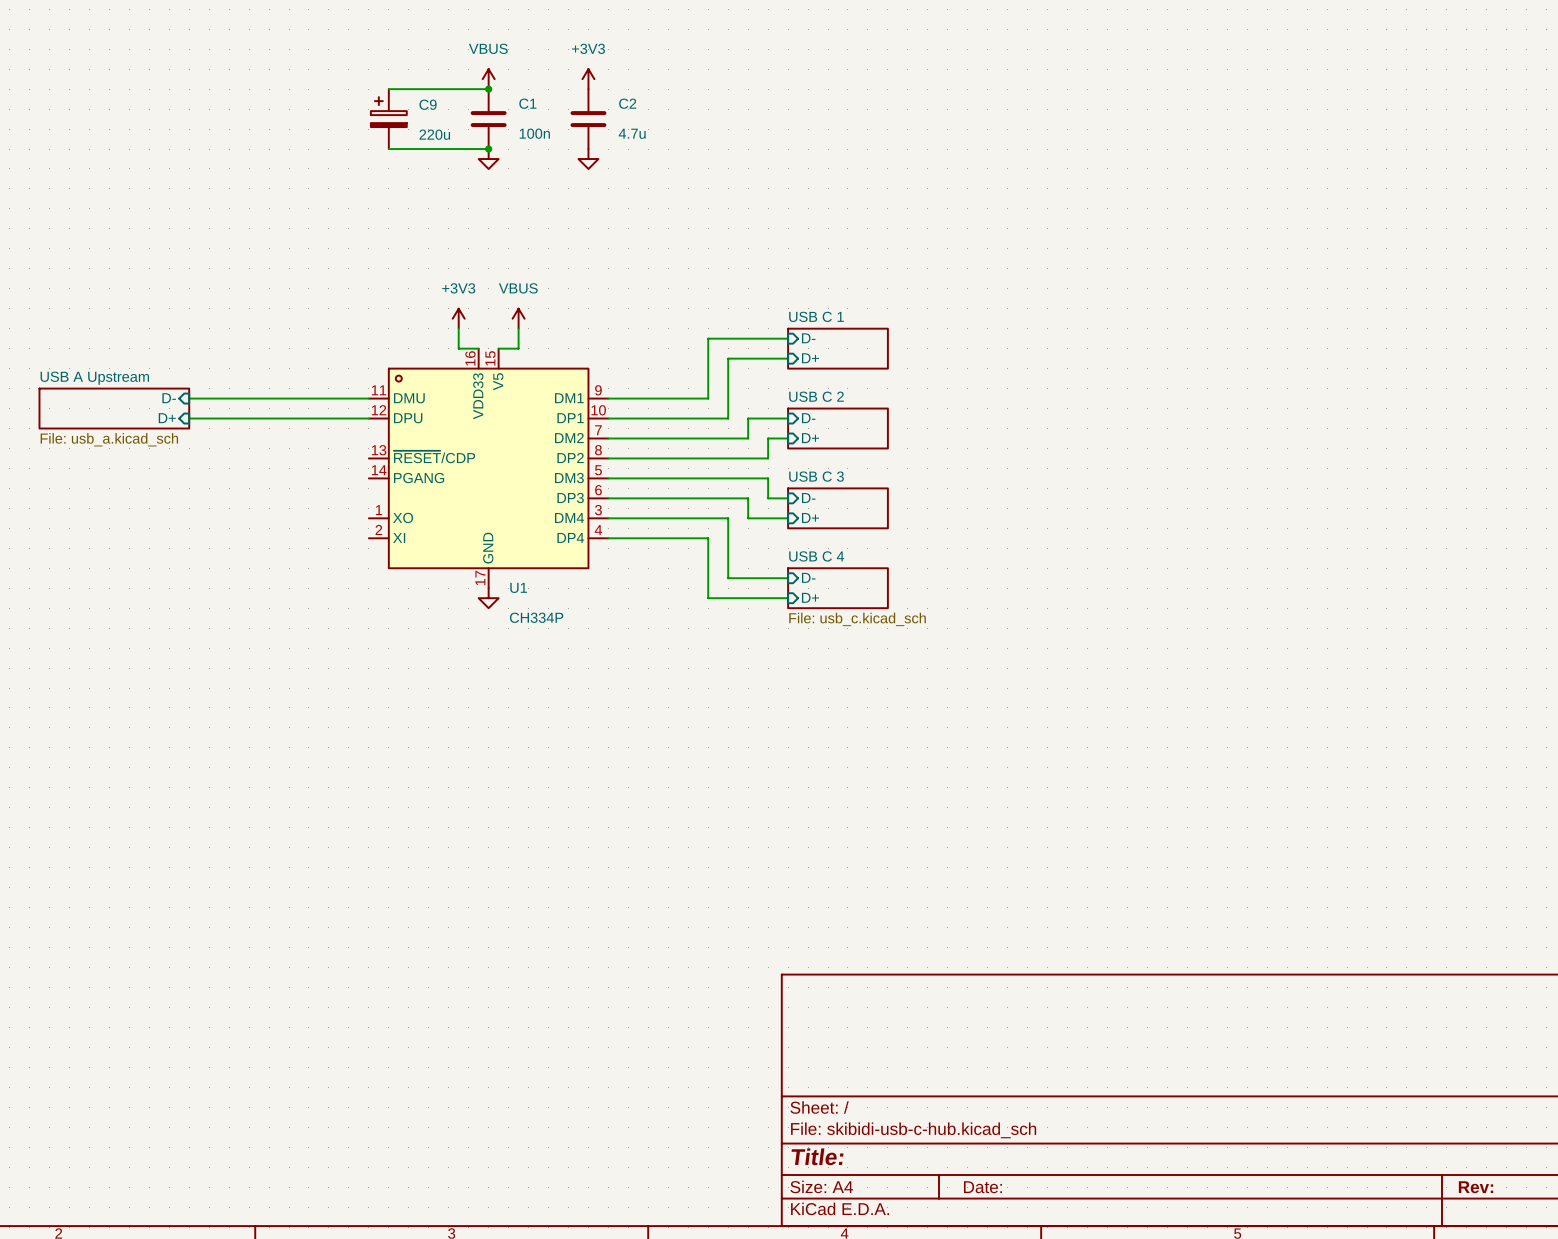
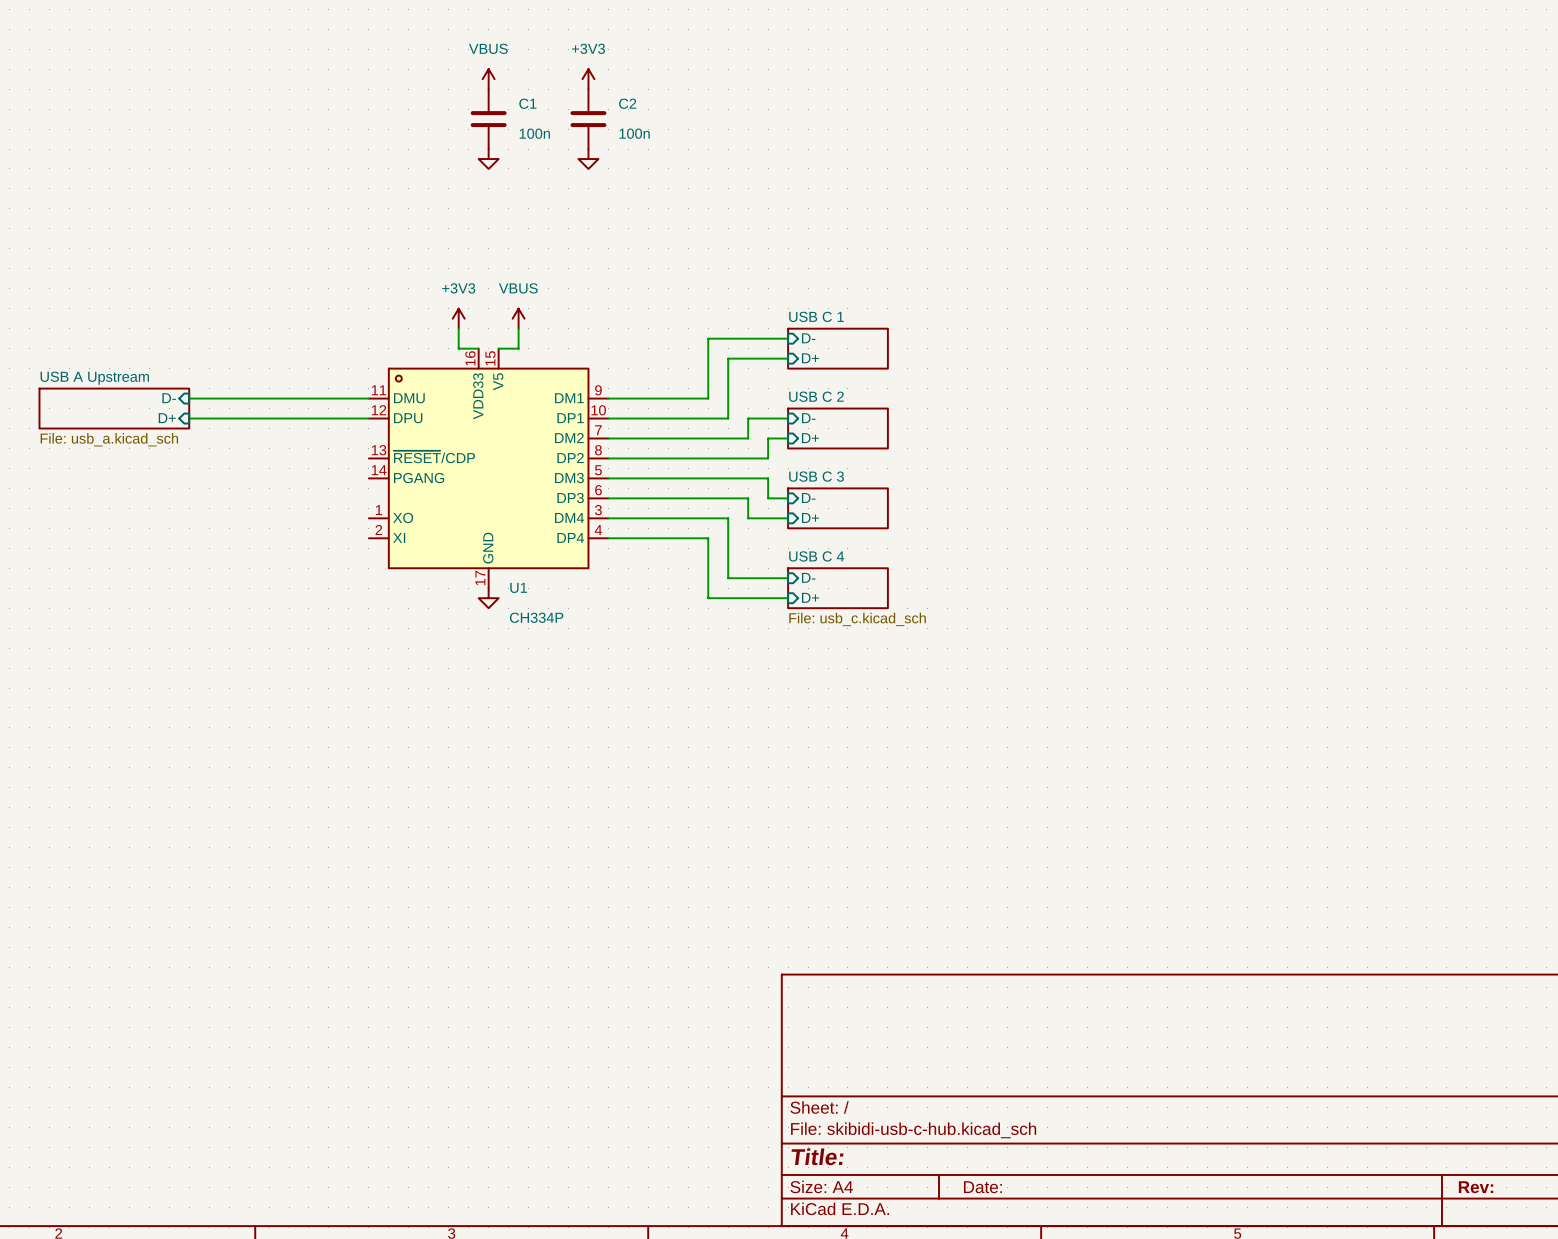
wire: (388, 89) (488, 89) -> none
junction: (488, 89) -> none
C9: 220u (388, 119) -> none
C2 value: 4.7u (632, 133) -> 100n (634, 133)
wire: (388, 149) (488, 149) -> none
junction: (488, 149) -> none

